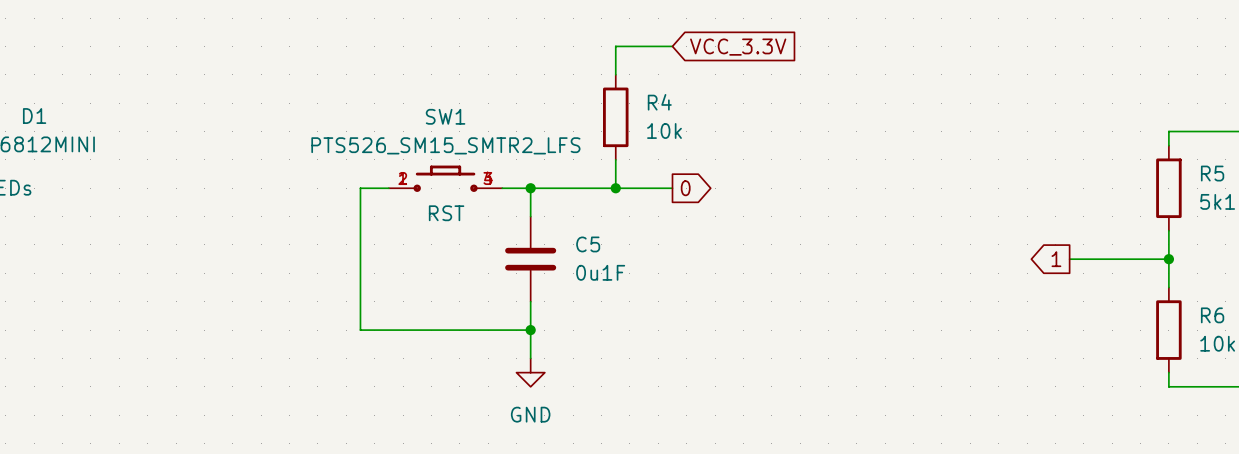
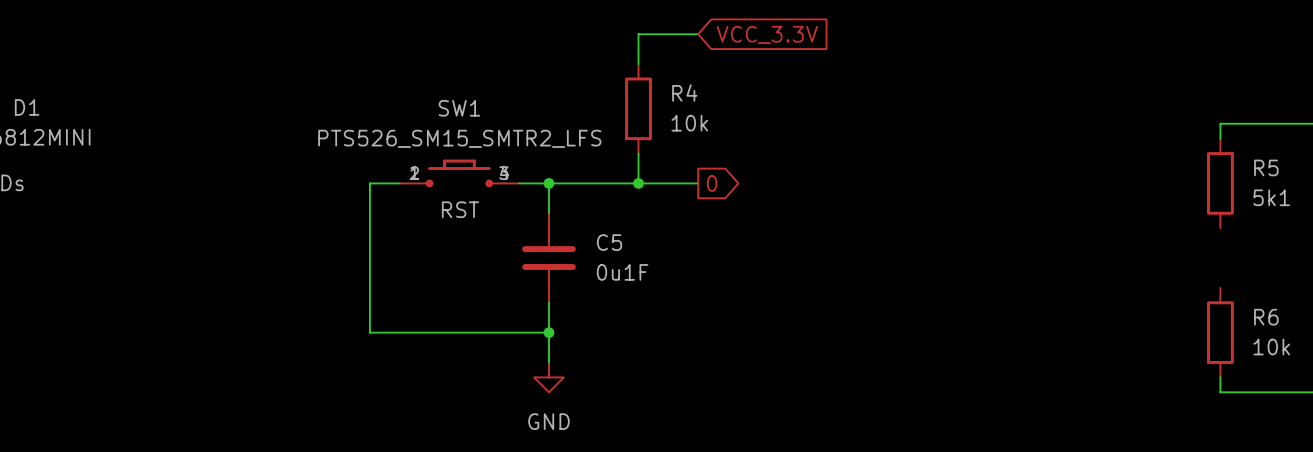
wire: (1168, 230) (1168, 287) -> none
global label: 1 (1056, 259) -> none
wire: (1069, 259) (1168, 259) -> none
junction: (1168, 259) -> none

